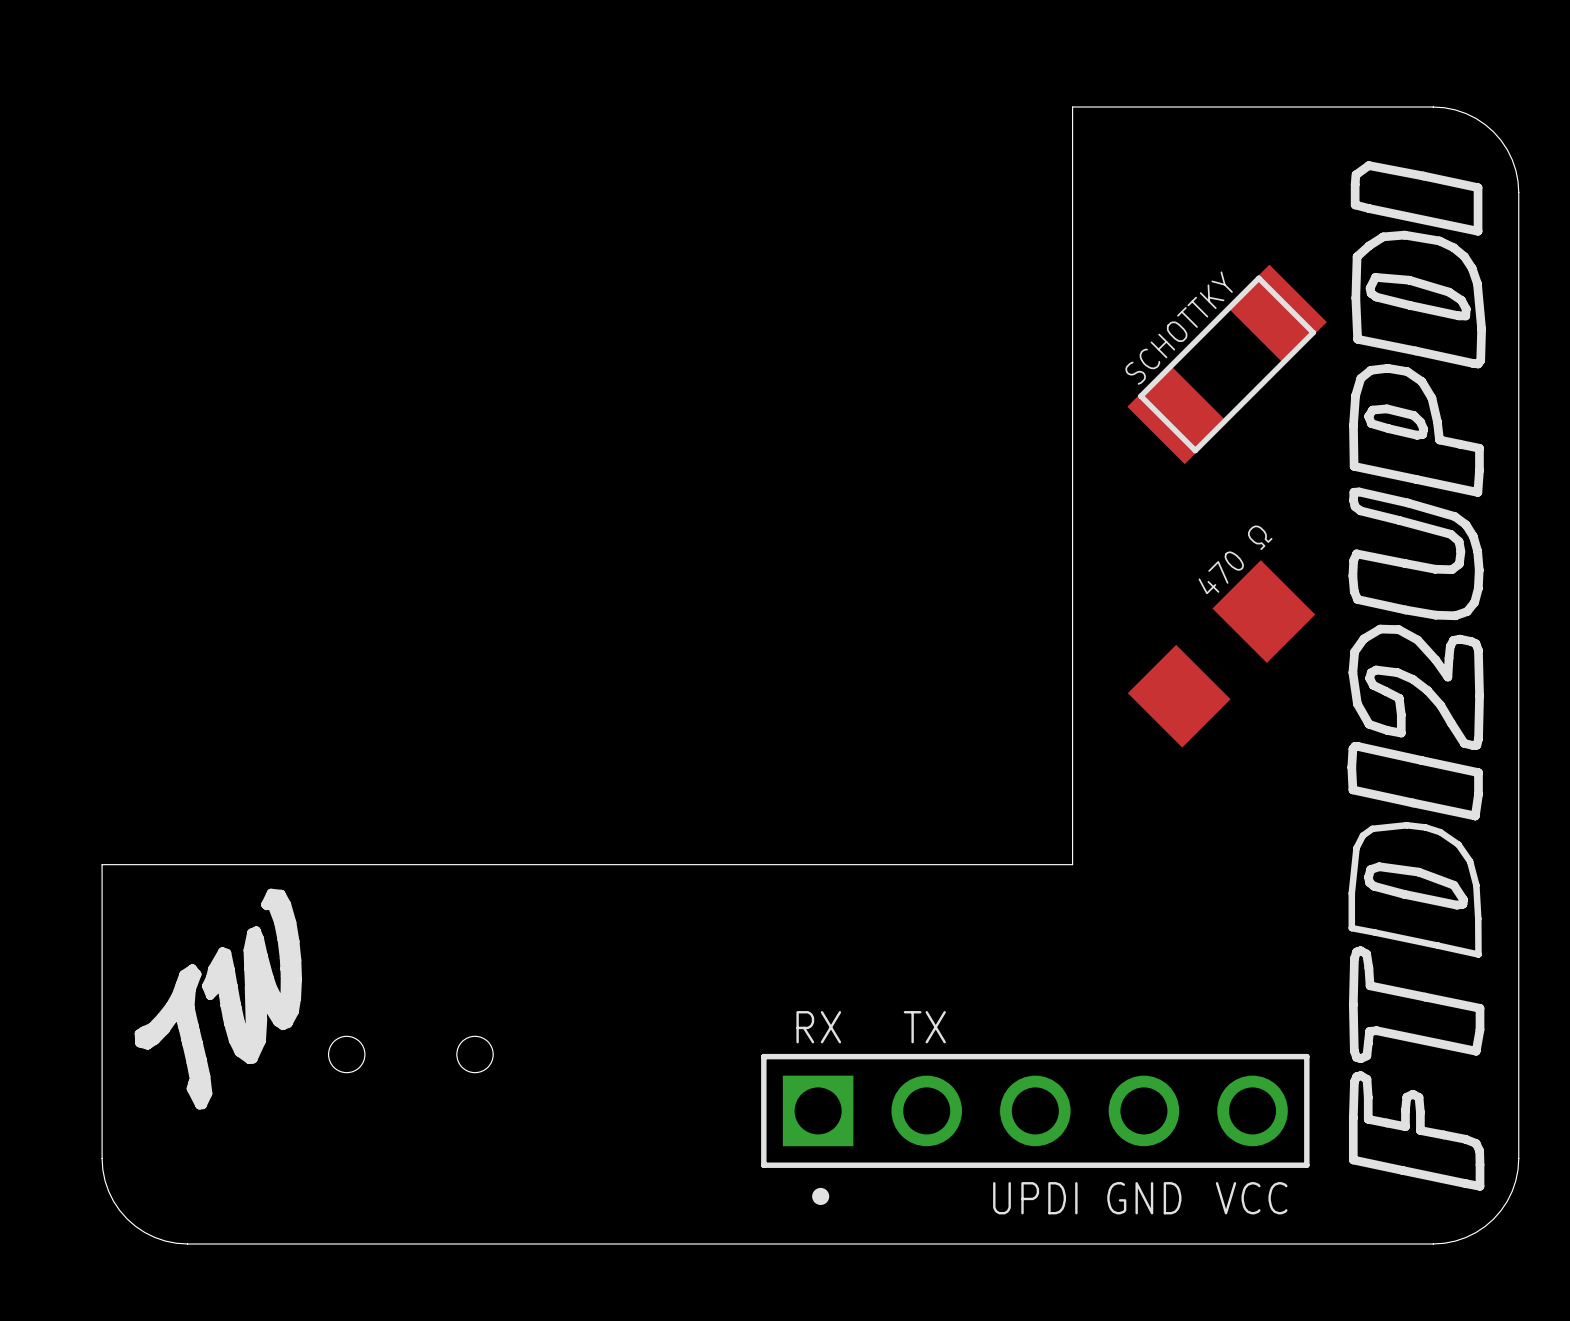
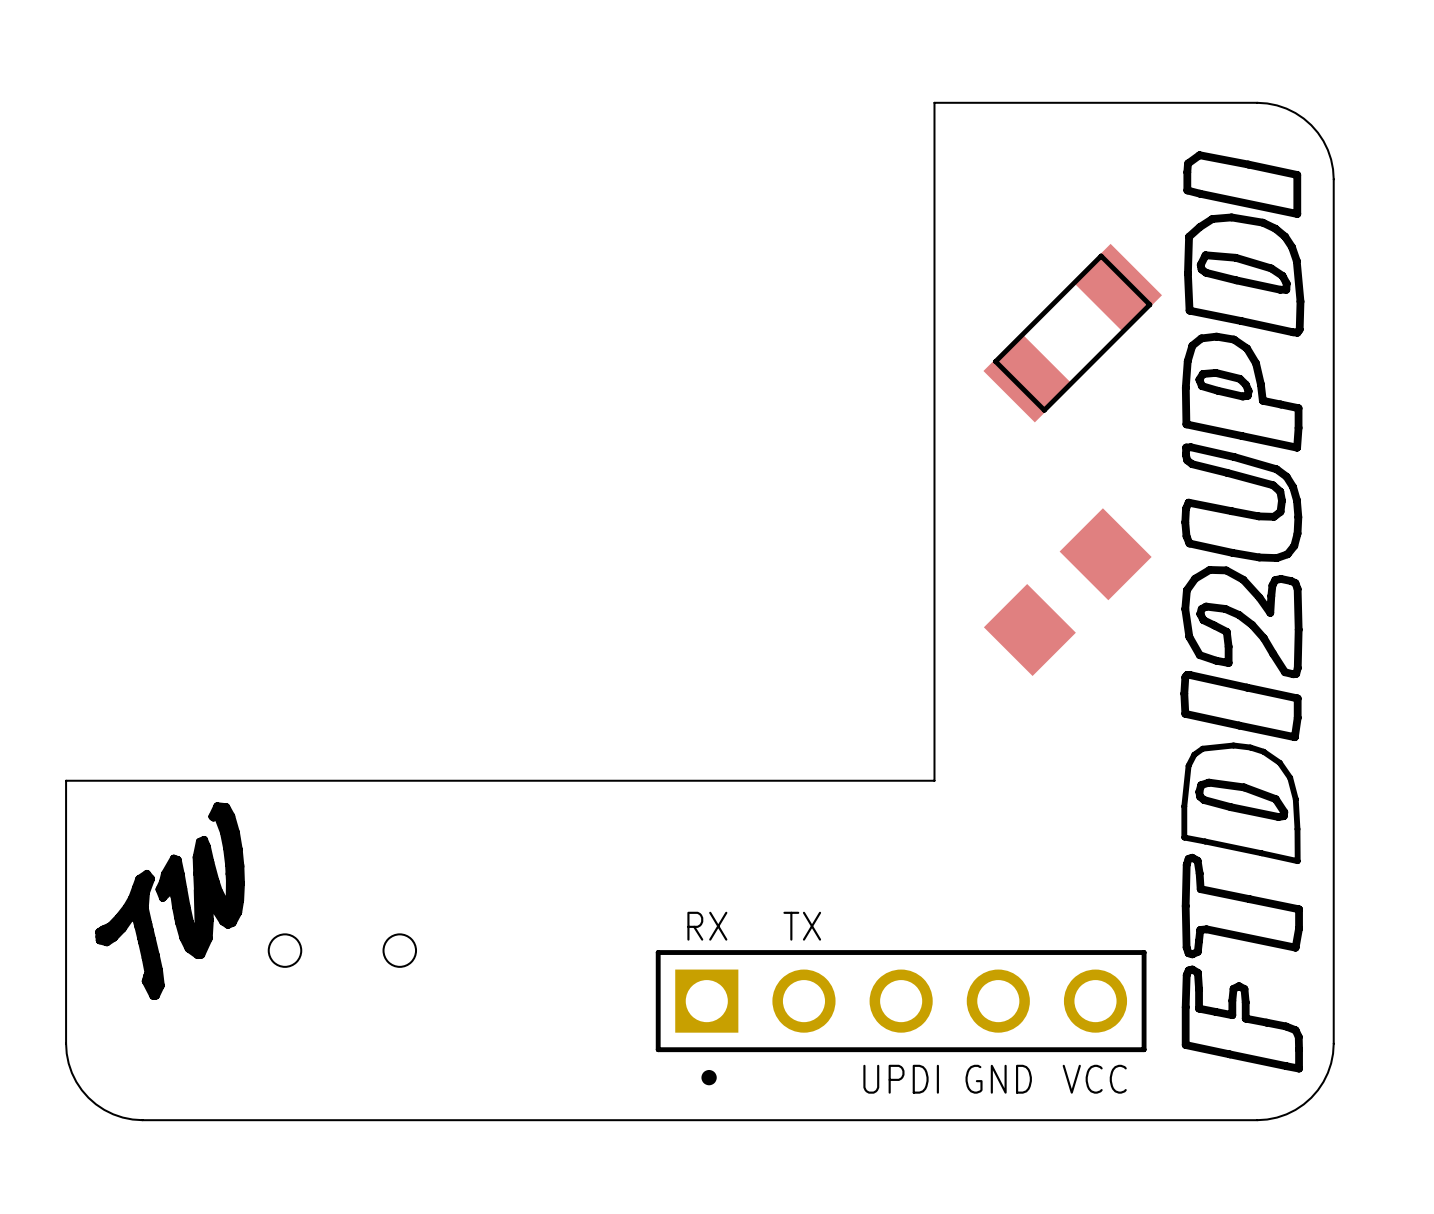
text: SCHOTTKY (1179, 328) -> none
text: 470 Ω (1235, 559) -> none

